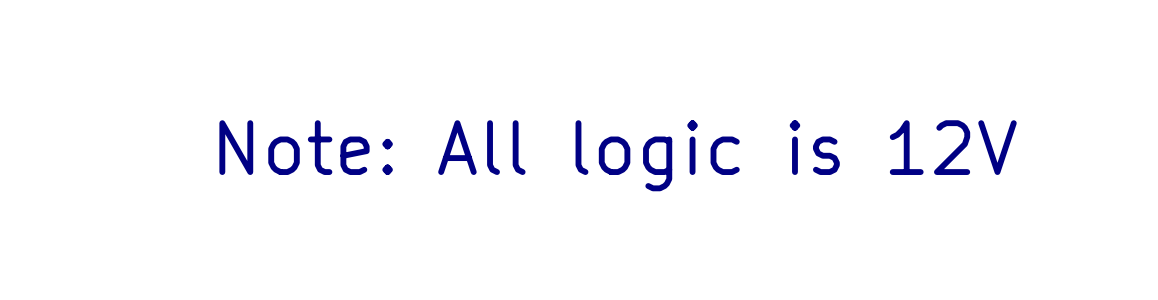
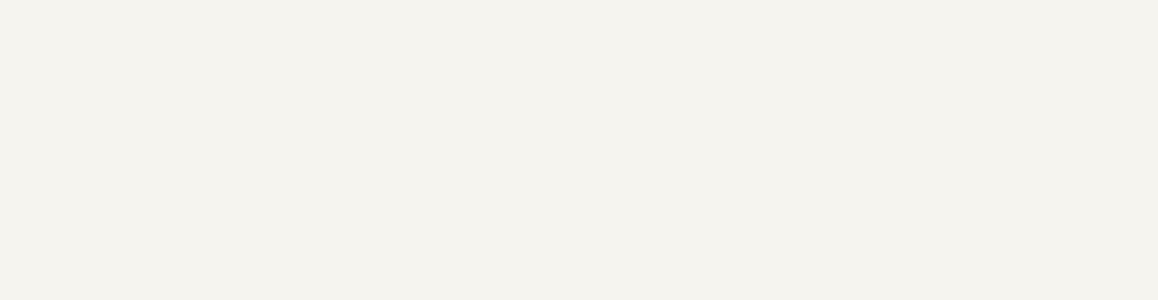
text: Note: All logic is 12V (618, 155) -> none

